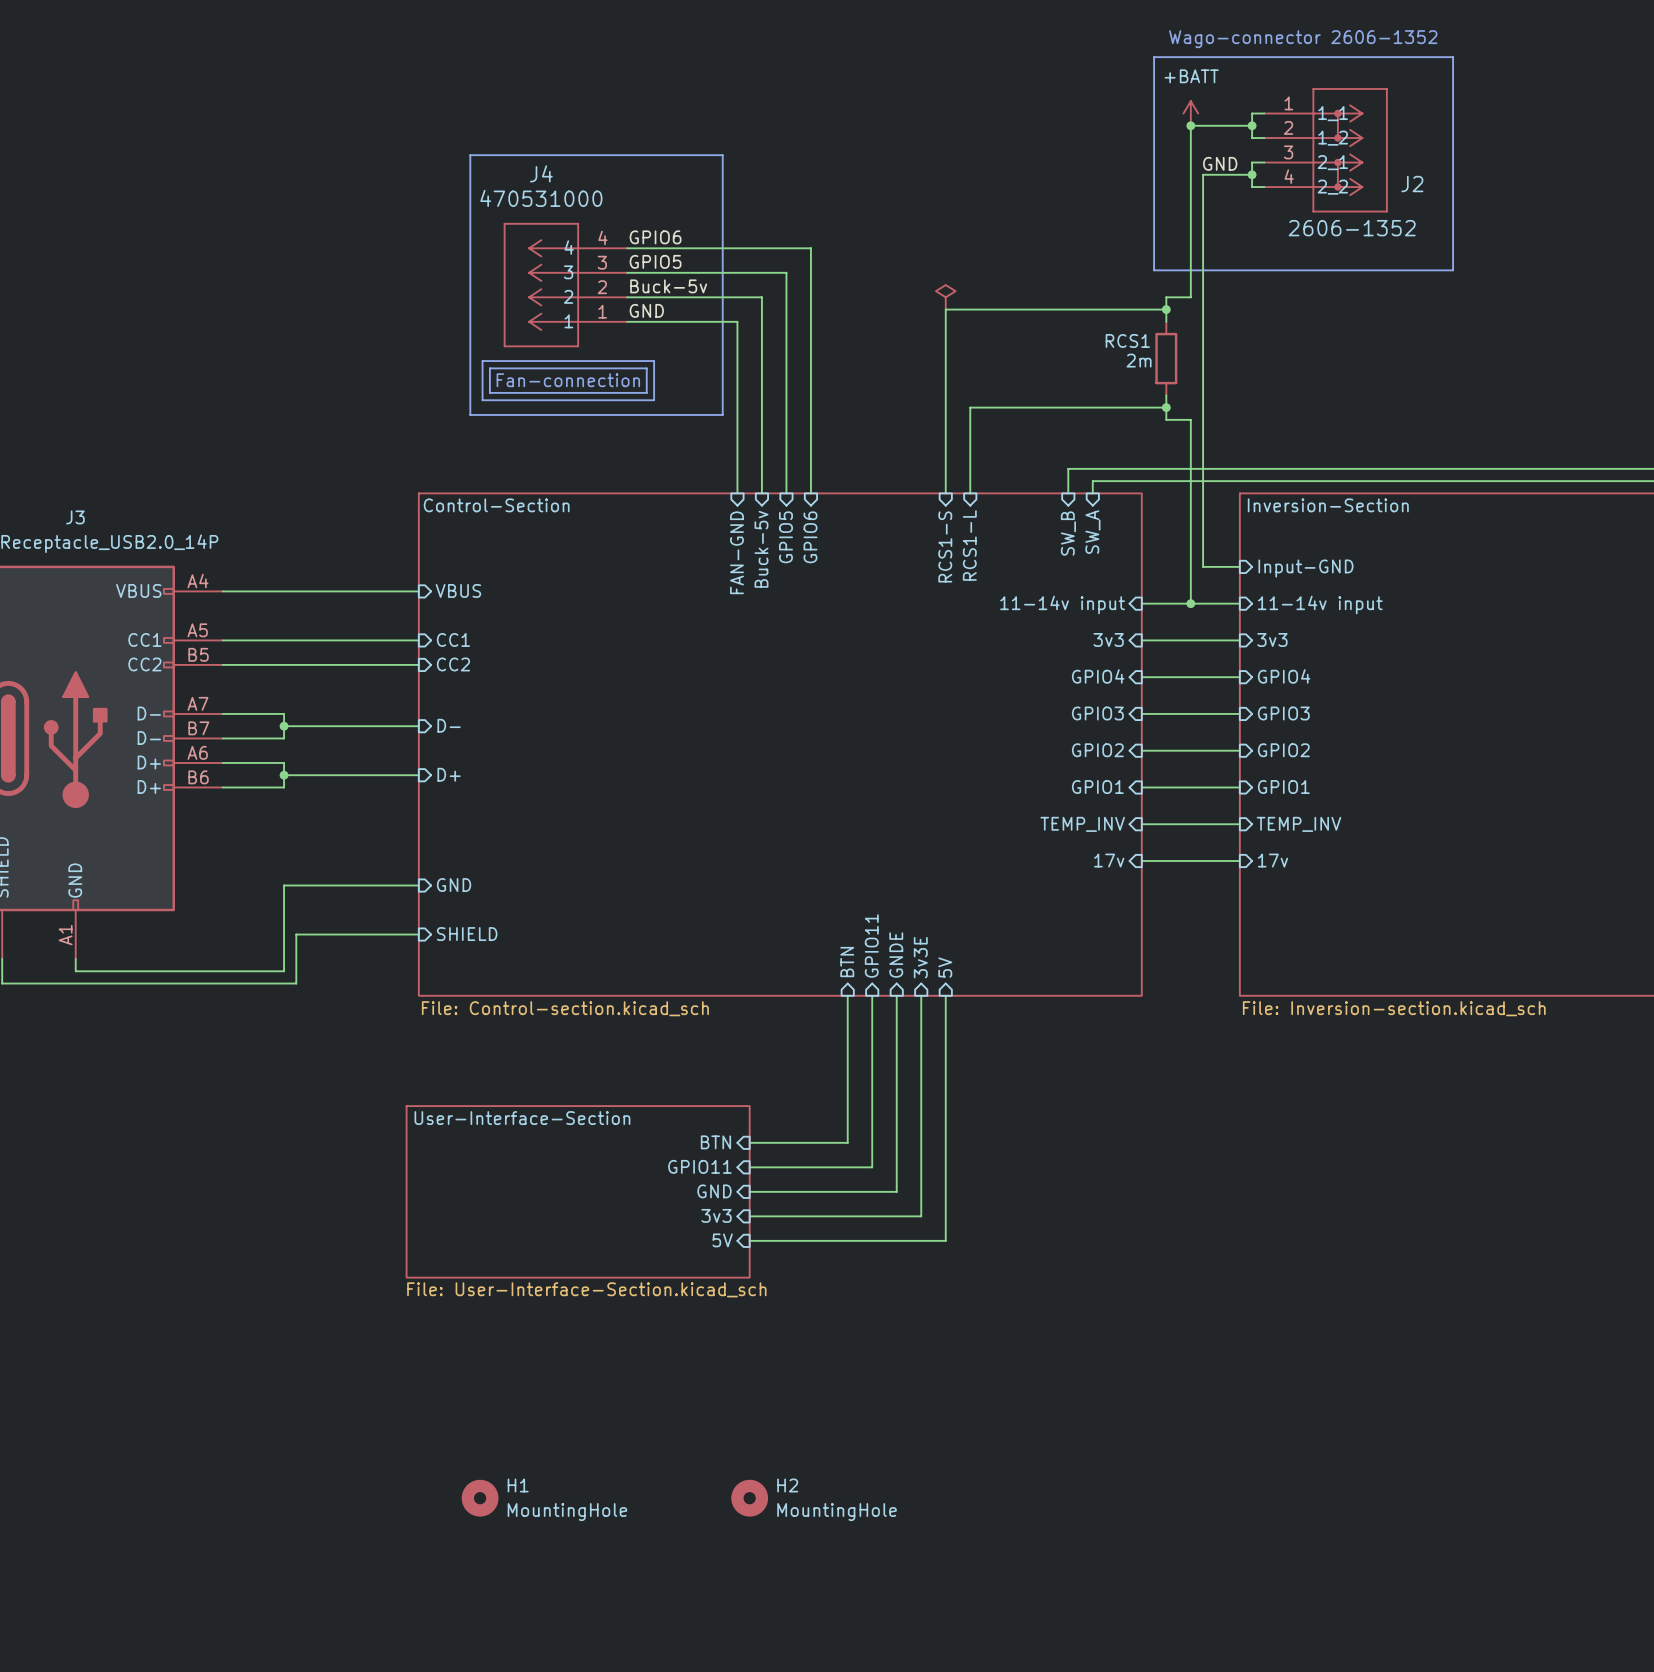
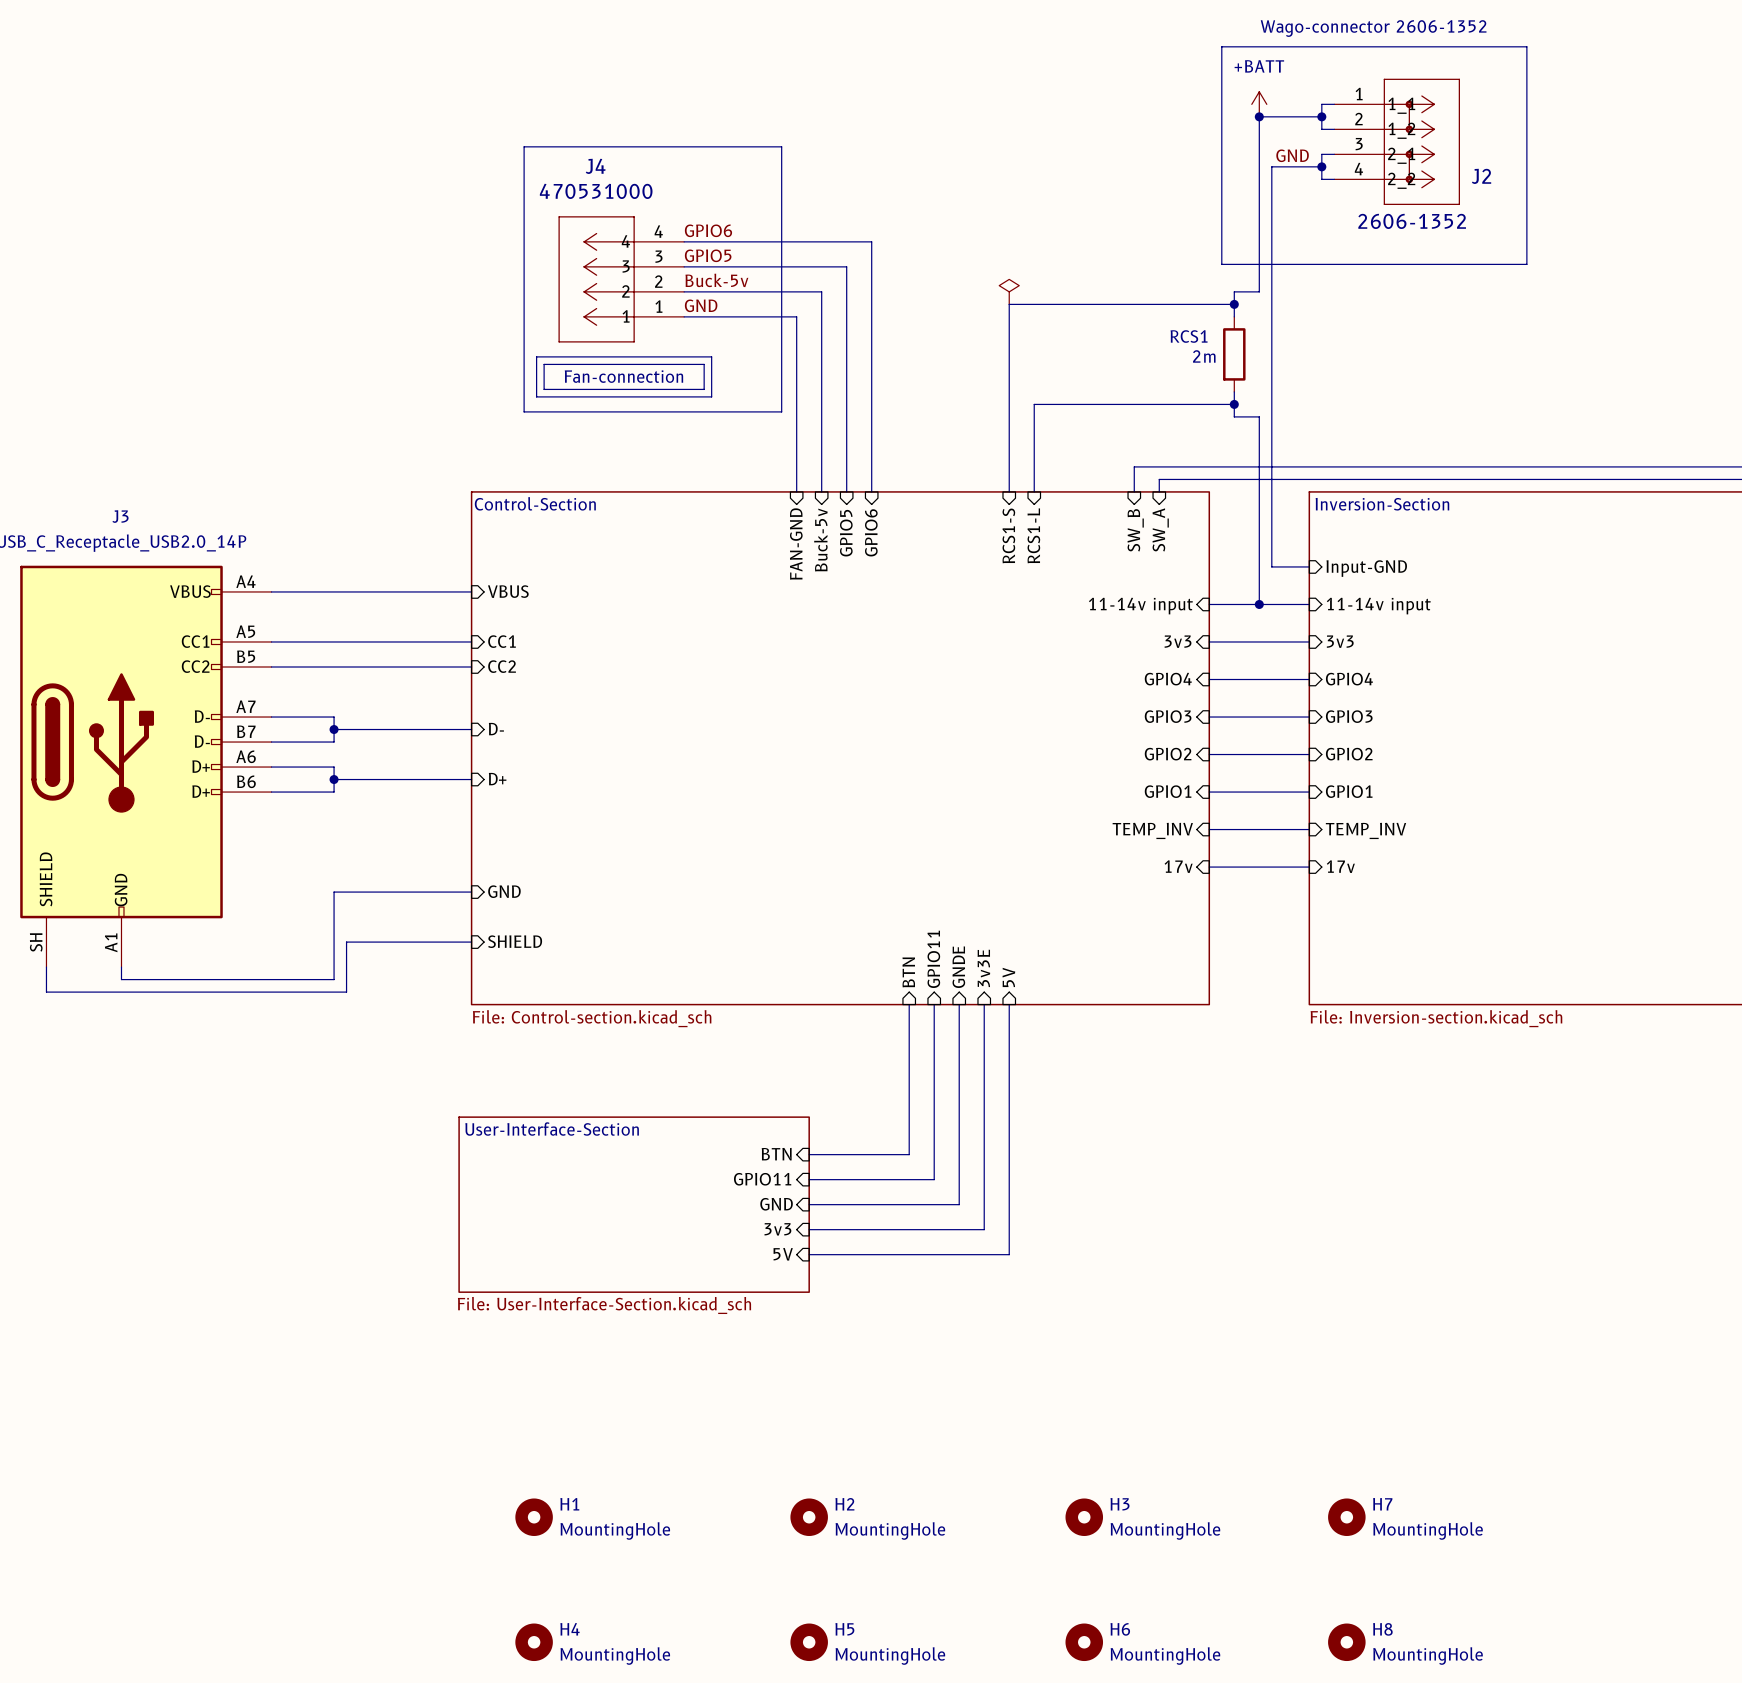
H3: none -> MountingHole (1084, 1517)
H7: none -> MountingHole (1346, 1517)
H4: none -> MountingHole (534, 1642)
H5: none -> MountingHole (809, 1642)
H6: none -> MountingHole (1084, 1642)
H8: none -> MountingHole (1346, 1642)

